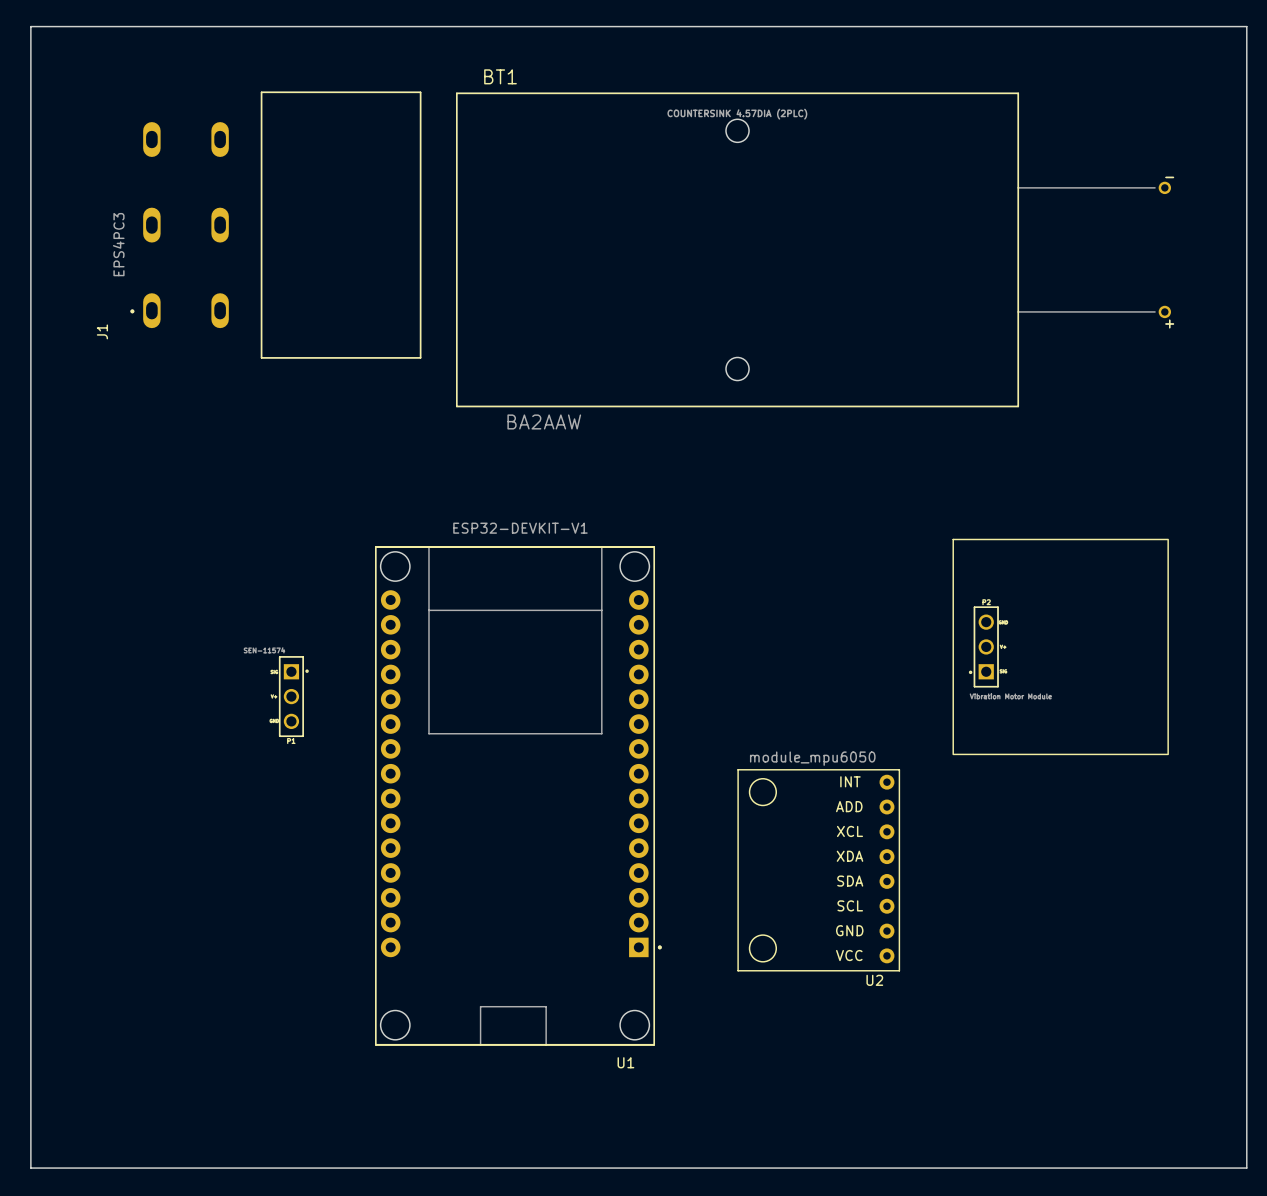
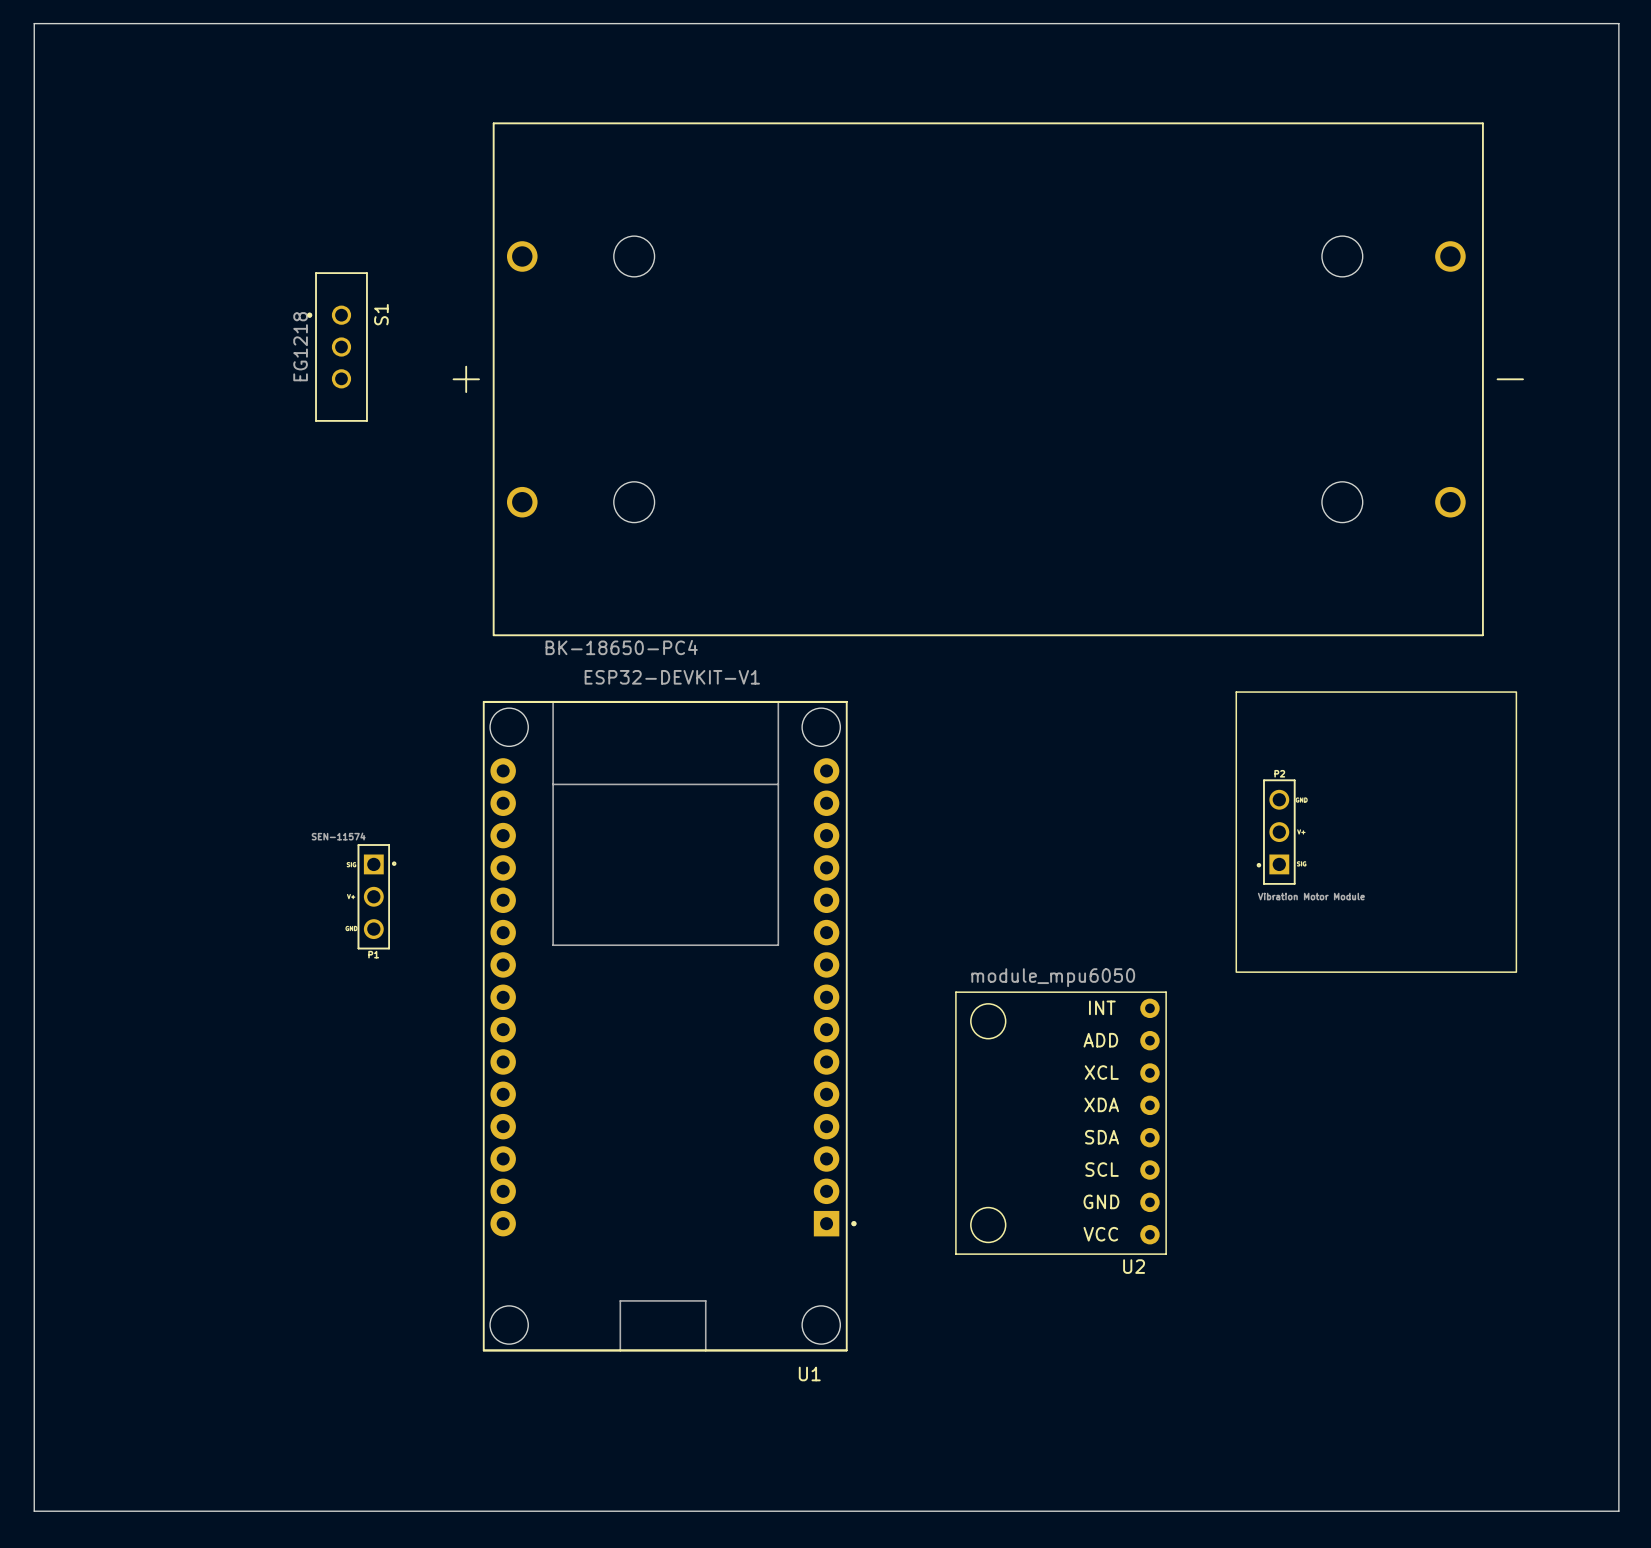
J1: EPS4PC3 (275, 225) -> none
BT1: BA2AAW (813, 249) -> none
S1: none -> EG1218 (337, 347)
part: none -> BK-18650-PC4 (988, 379)

